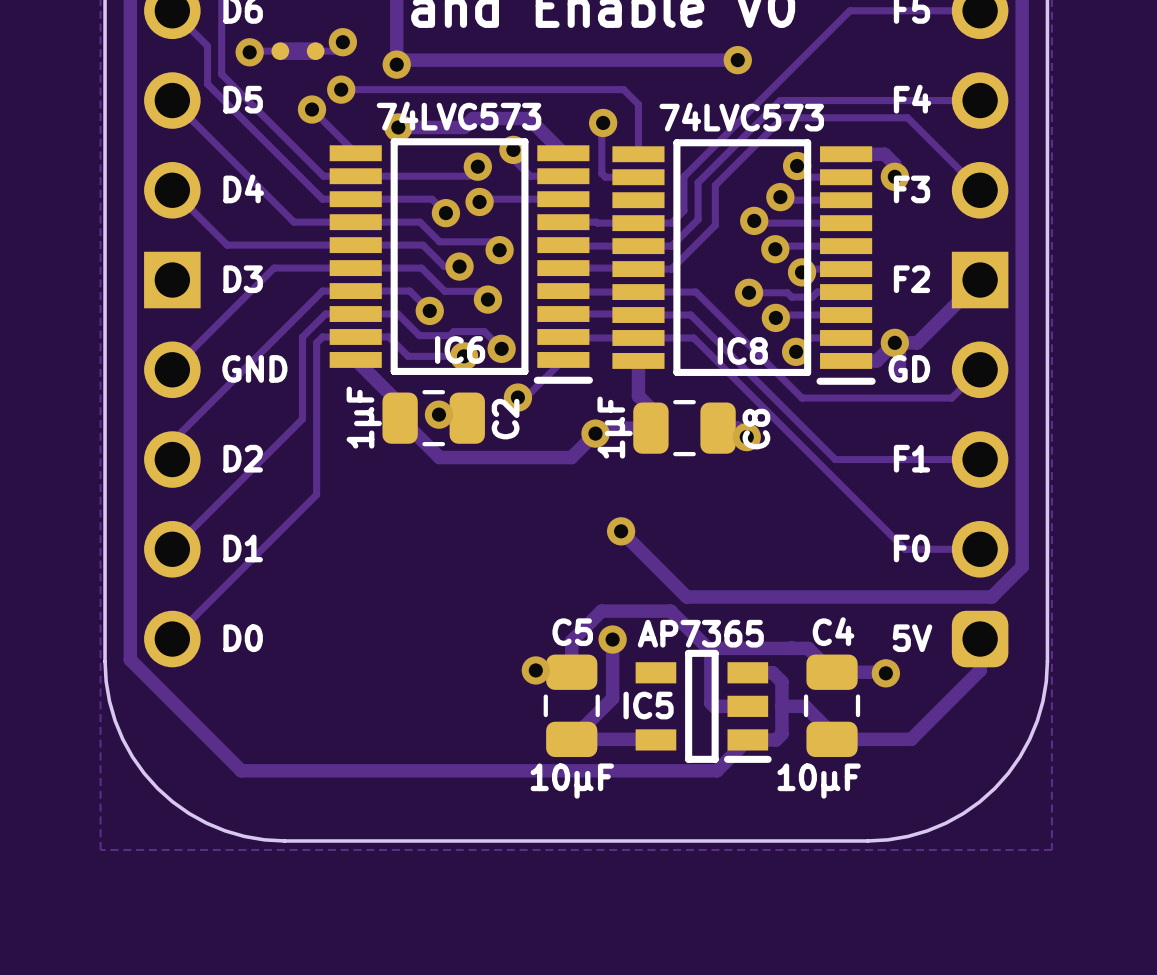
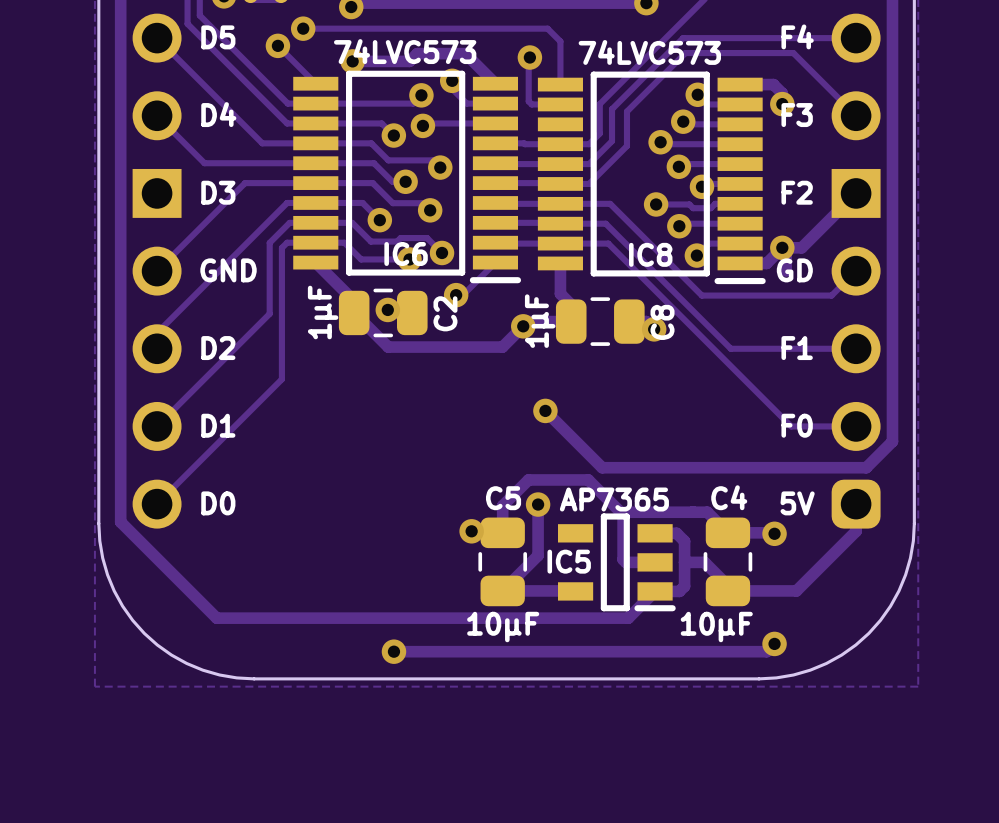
track: none -> (774, 643) (766, 651) (393, 651)
via: none -> (774, 643)
via: none -> (393, 651)

